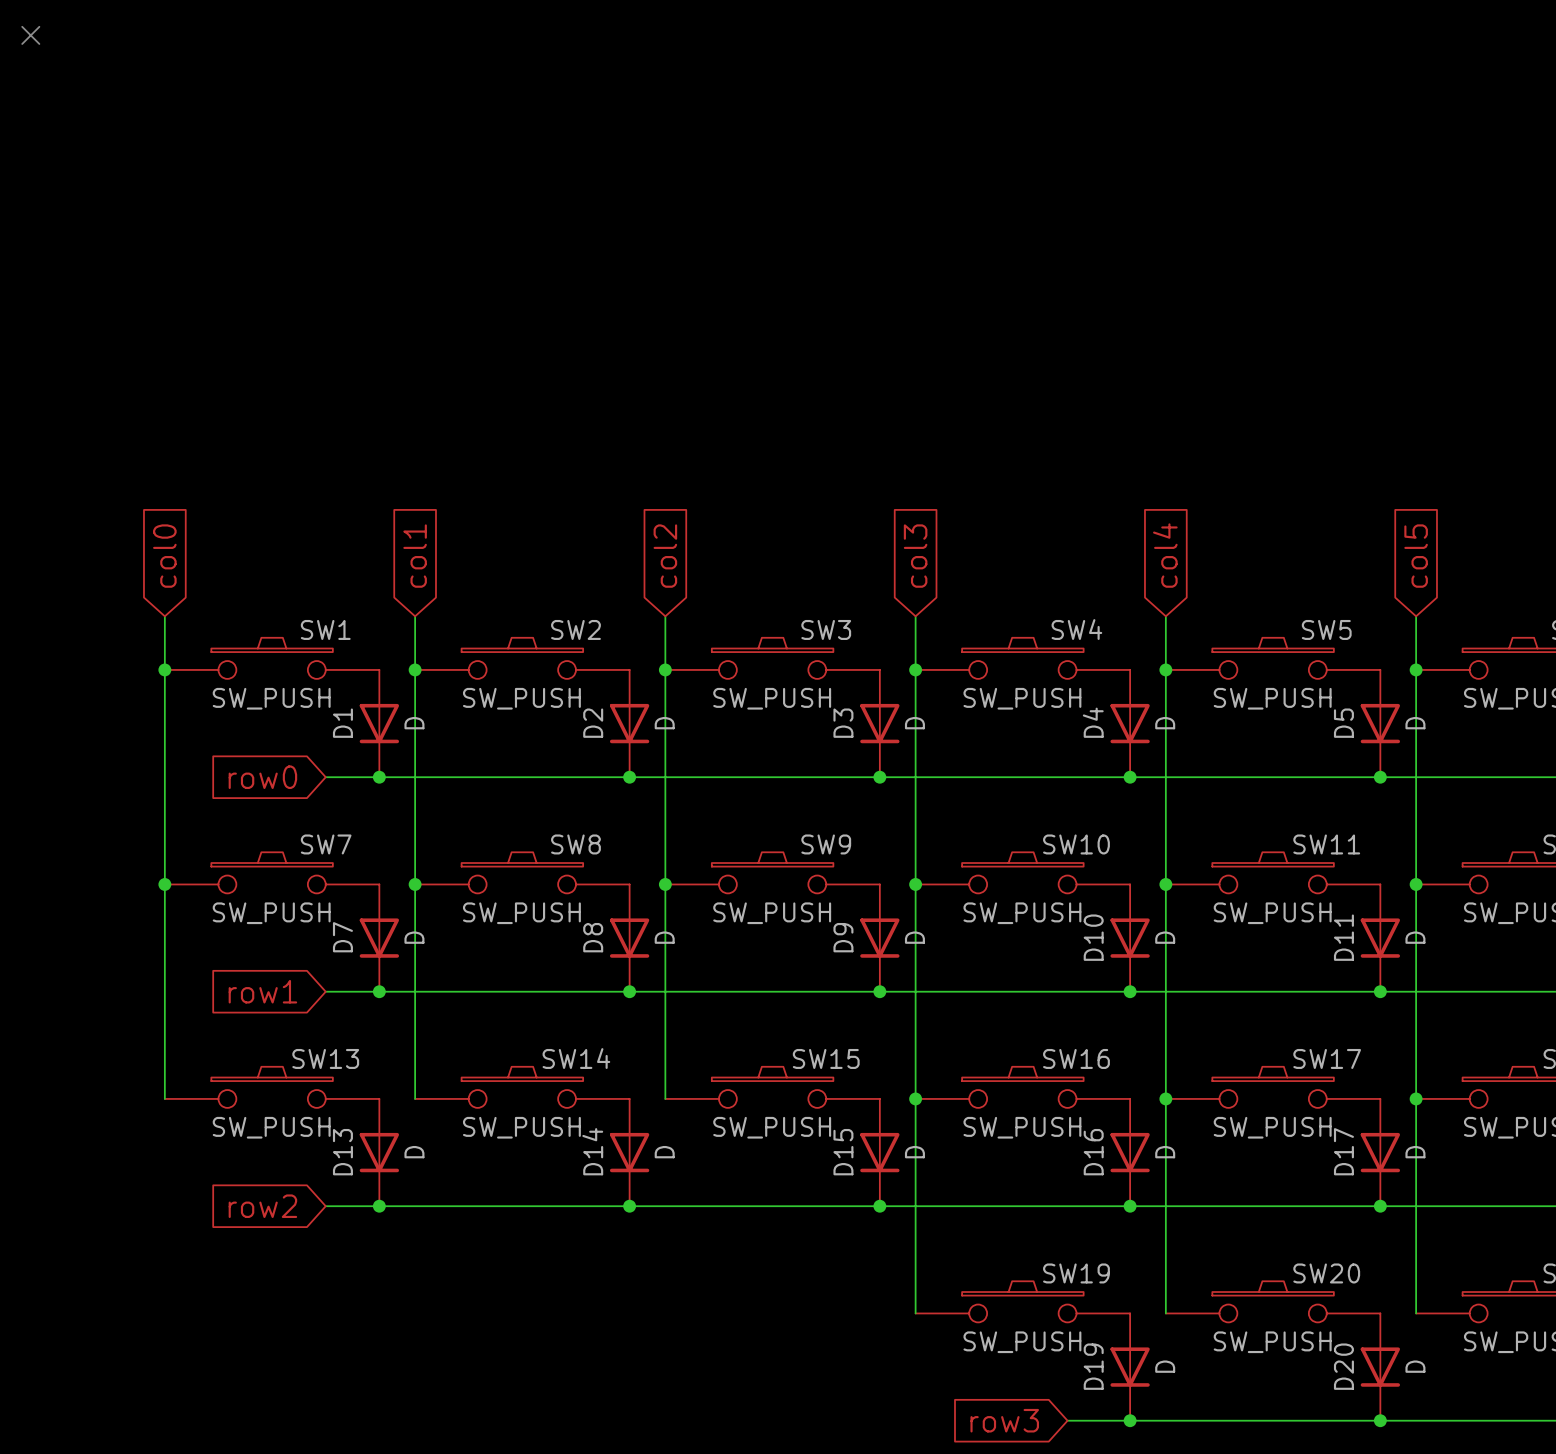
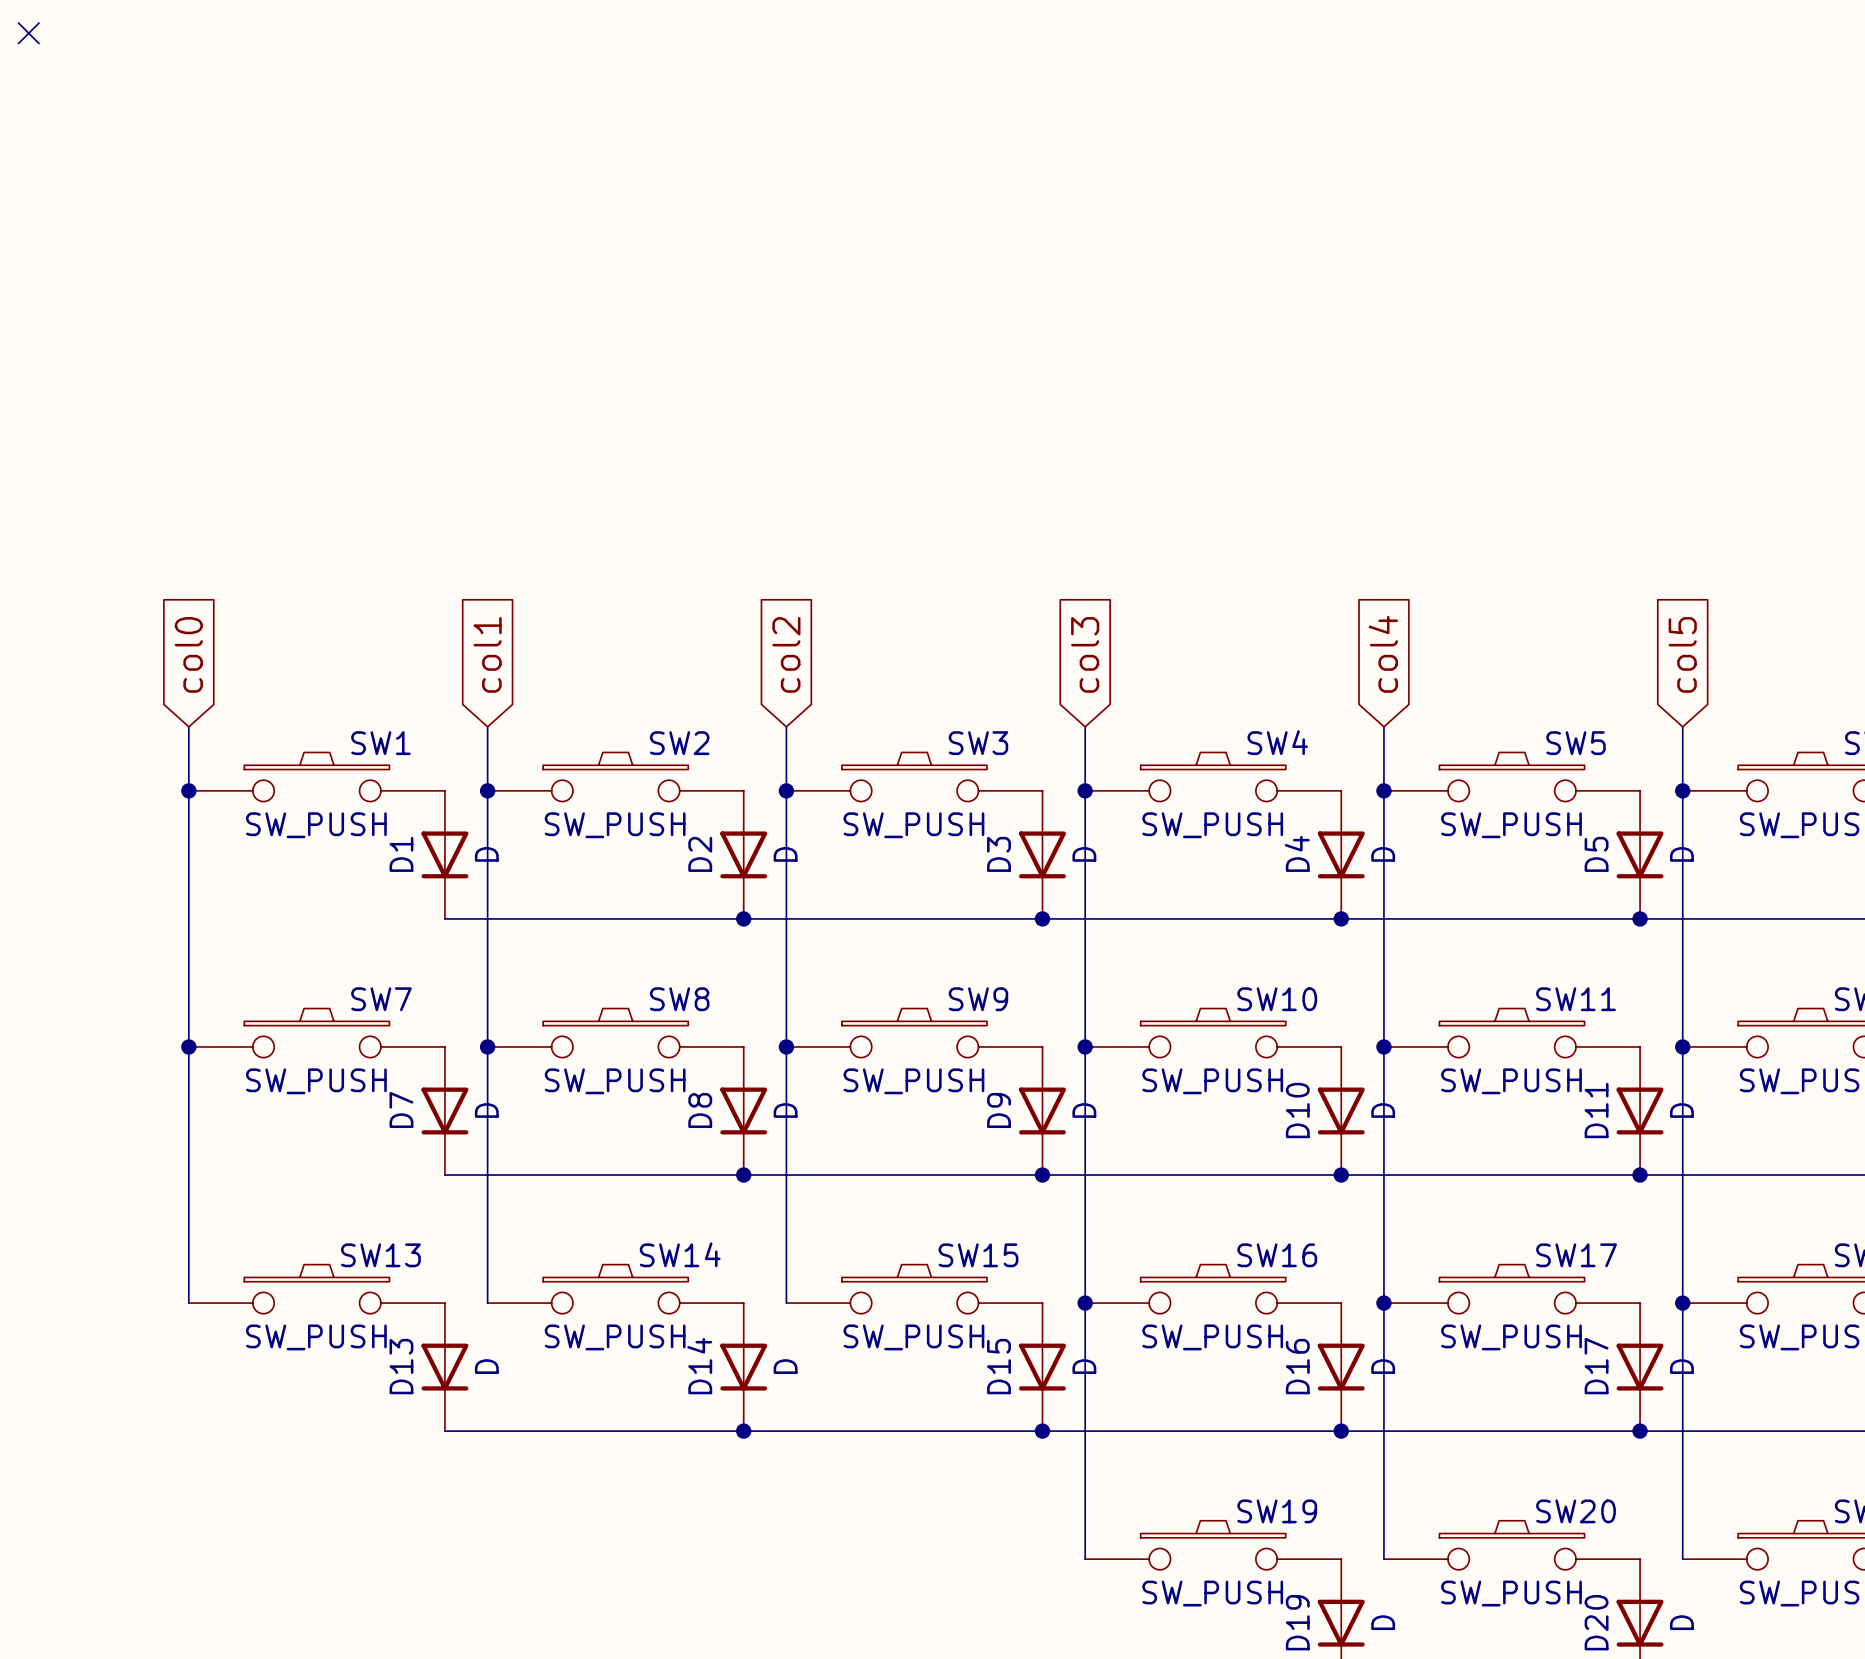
global label: row0 (262, 777) -> none
wire: (325, 777) (379, 777) -> none
junction: (379, 777) -> none
global label: row1 (262, 991) -> none
wire: (325, 991) (379, 991) -> none
junction: (379, 991) -> none
global label: row2 (262, 1206) -> none
wire: (325, 1206) (379, 1206) -> none
junction: (379, 1206) -> none

